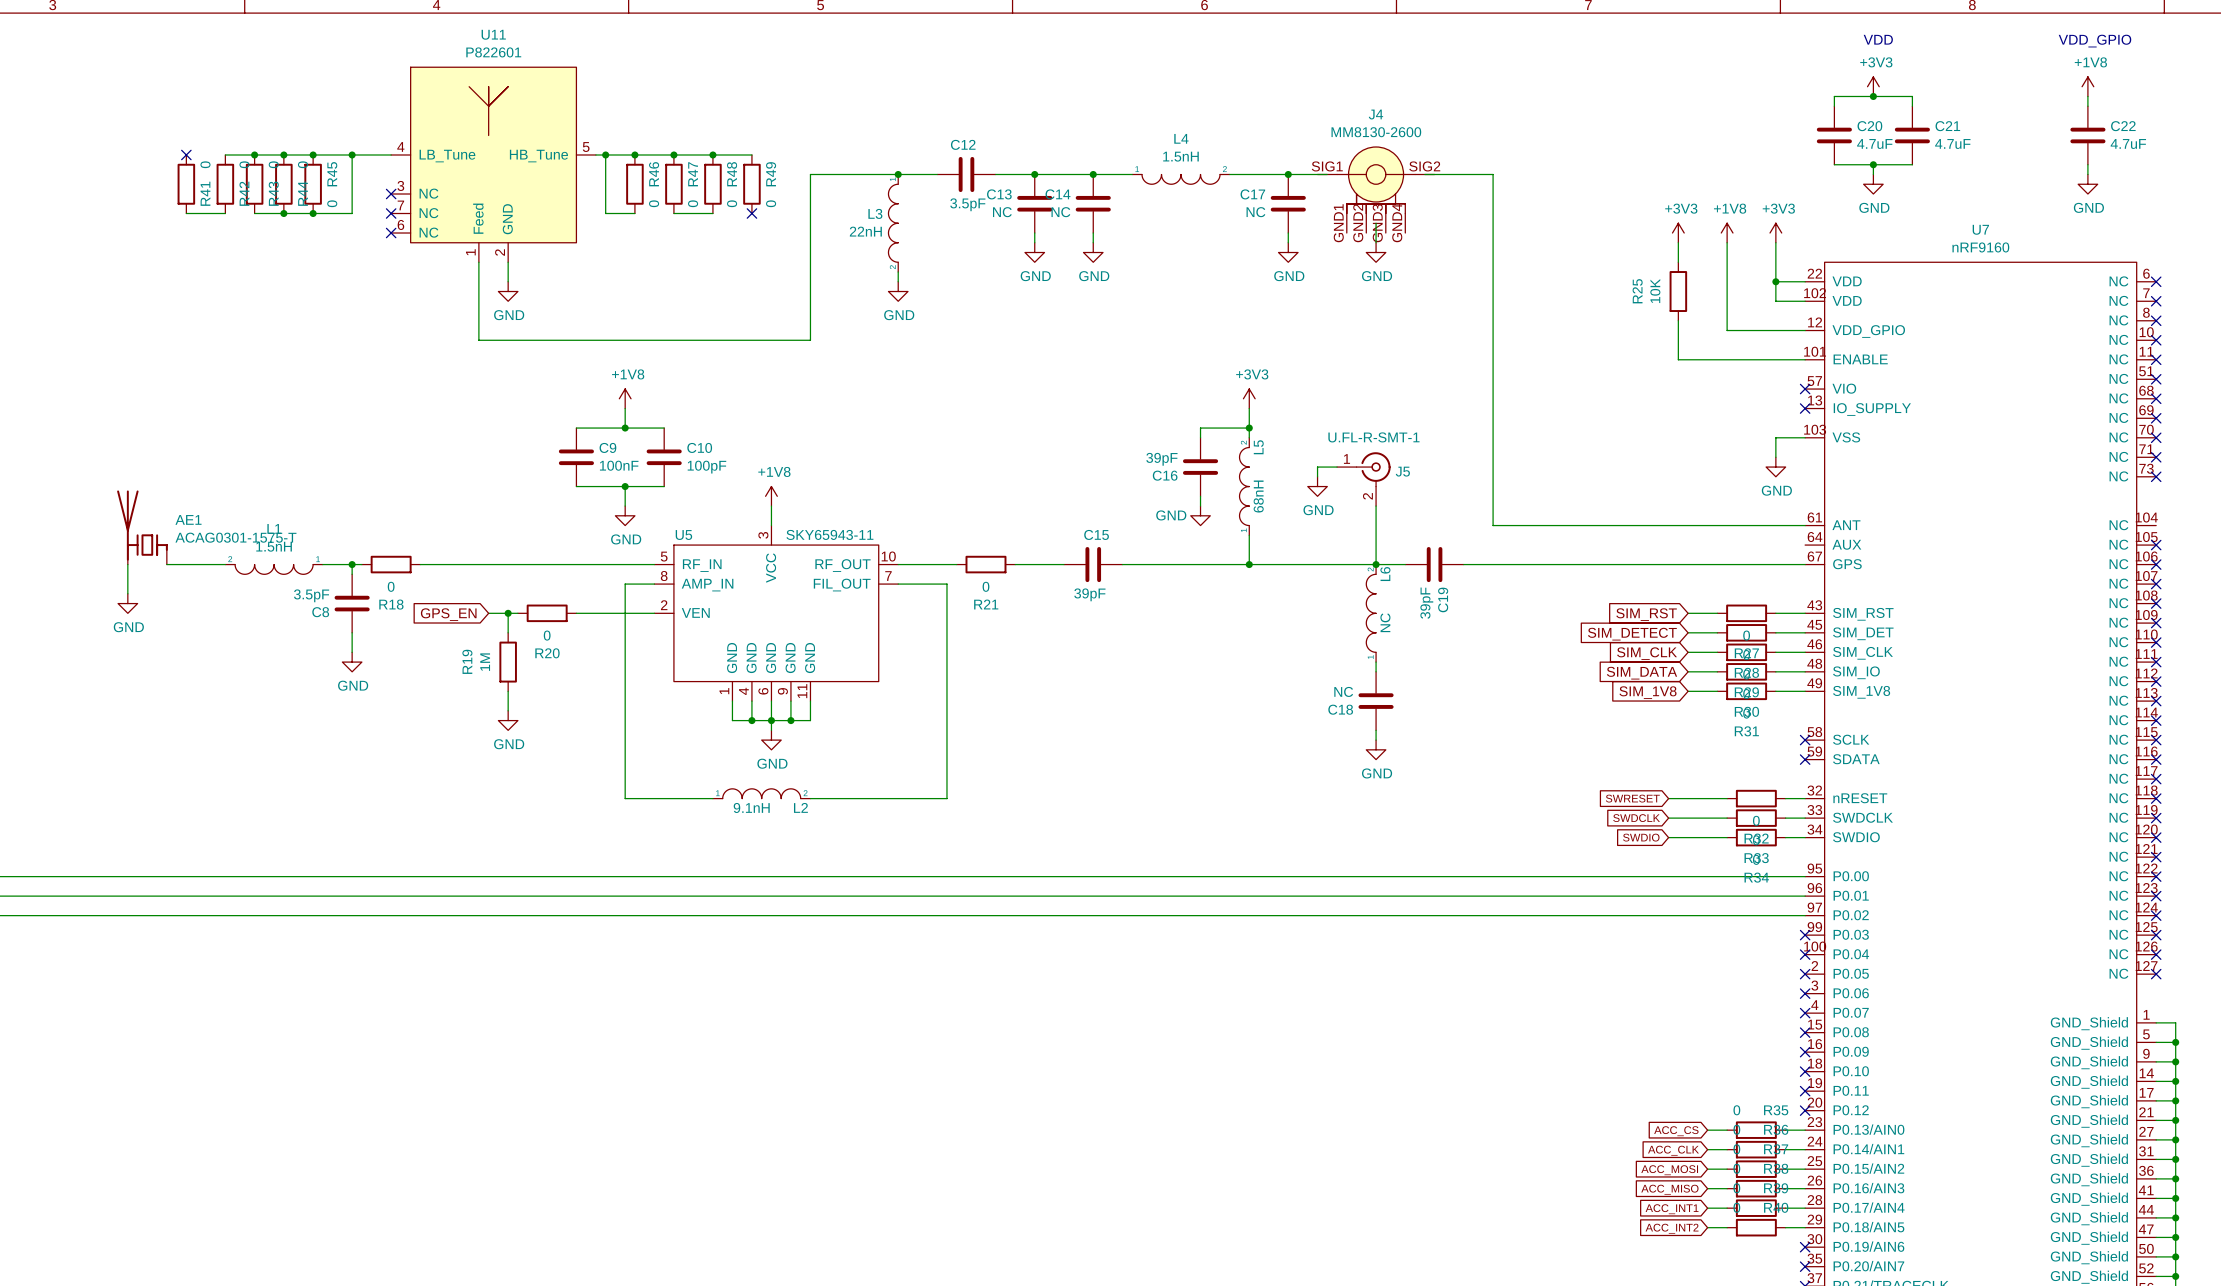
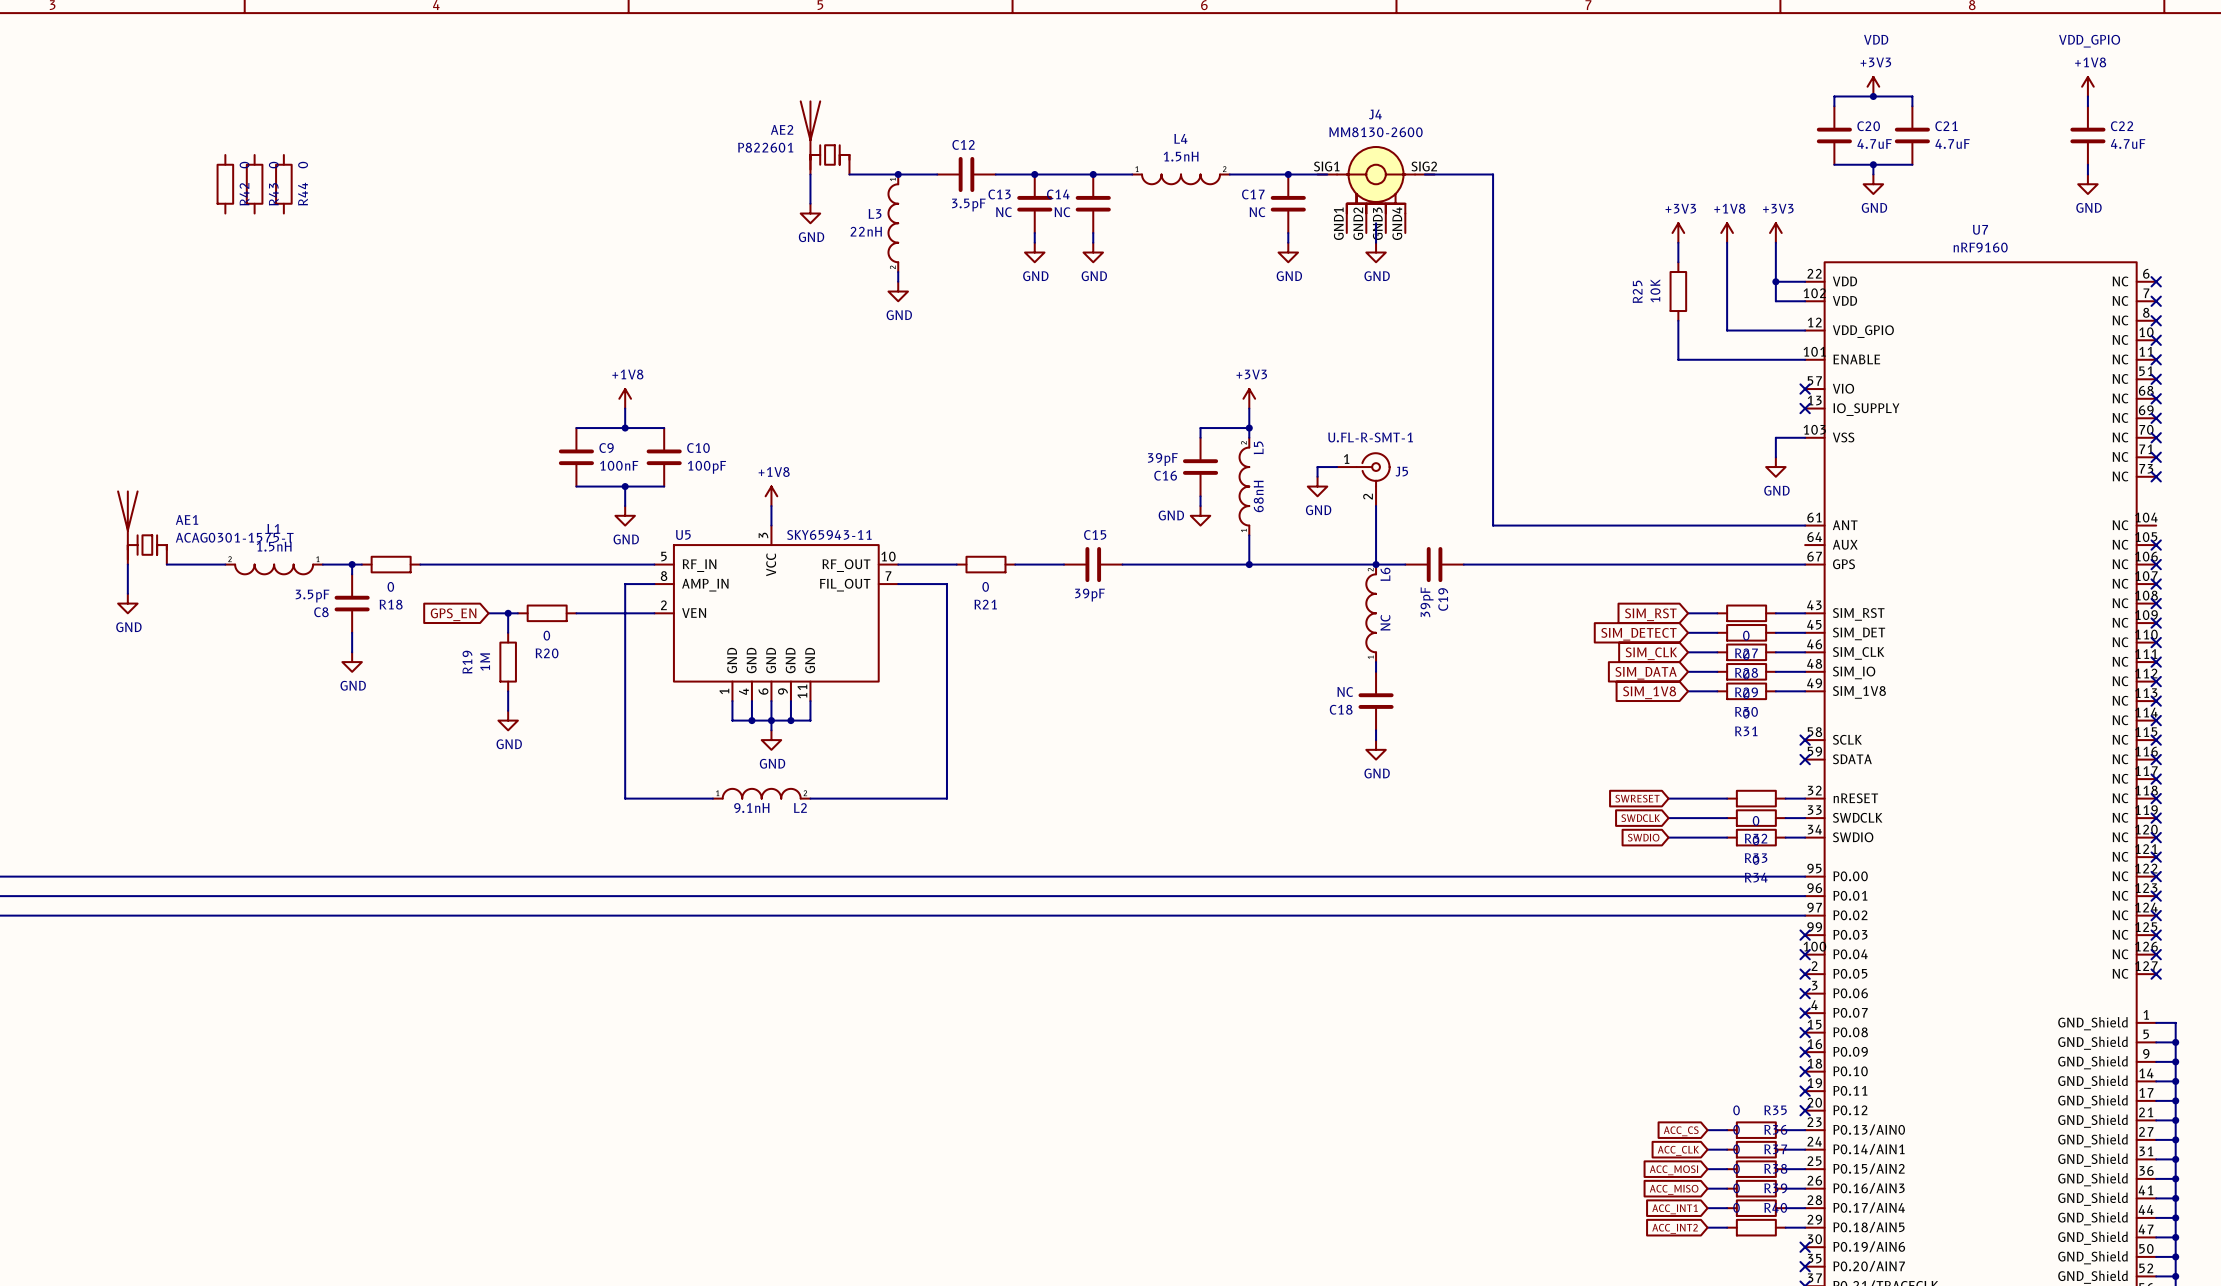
AE2: none -> P822601 (825, 137)
no-connect mark: (186, 154) -> none
wire: (225, 154) (391, 154) -> none
junction: (254, 154) -> none
junction: (283, 154) -> none
junction: (313, 154) -> none
wire: (352, 154) (352, 213) (254, 213) -> none
junction: (352, 154) -> none
wire: (595, 154) (751, 154) -> none
wire: (605, 154) (605, 213) (634, 213) -> none
junction: (605, 154) -> none
junction: (634, 154) -> none
junction: (673, 154) -> none
junction: (712, 154) -> none
U11: P822601 (493, 164) -> none
wire: (810, 174) (849, 174) -> none
R41: 0 (186, 184) -> none
R45: 0 (313, 184) -> none
R46: 0 (634, 184) -> none
R47: 0 (673, 184) -> none
R48: 0 (712, 184) -> none
R49: 0 (751, 184) -> none
no-connect mark: (391, 194) -> none
wire: (810, 203) (810, 340) (478, 340) (478, 262) -> none
wire: (186, 213) (225, 213) -> none
junction: (283, 213) -> none
junction: (313, 213) -> none
no-connect mark: (391, 213) -> none
wire: (673, 213) (712, 213) -> none
no-connect mark: (751, 213) -> none
power symbol: none -> GND (810, 213)
no-connect mark: (391, 233) -> none
wire: (508, 262) (508, 281) -> none
power symbol: GND (508, 291) -> none

